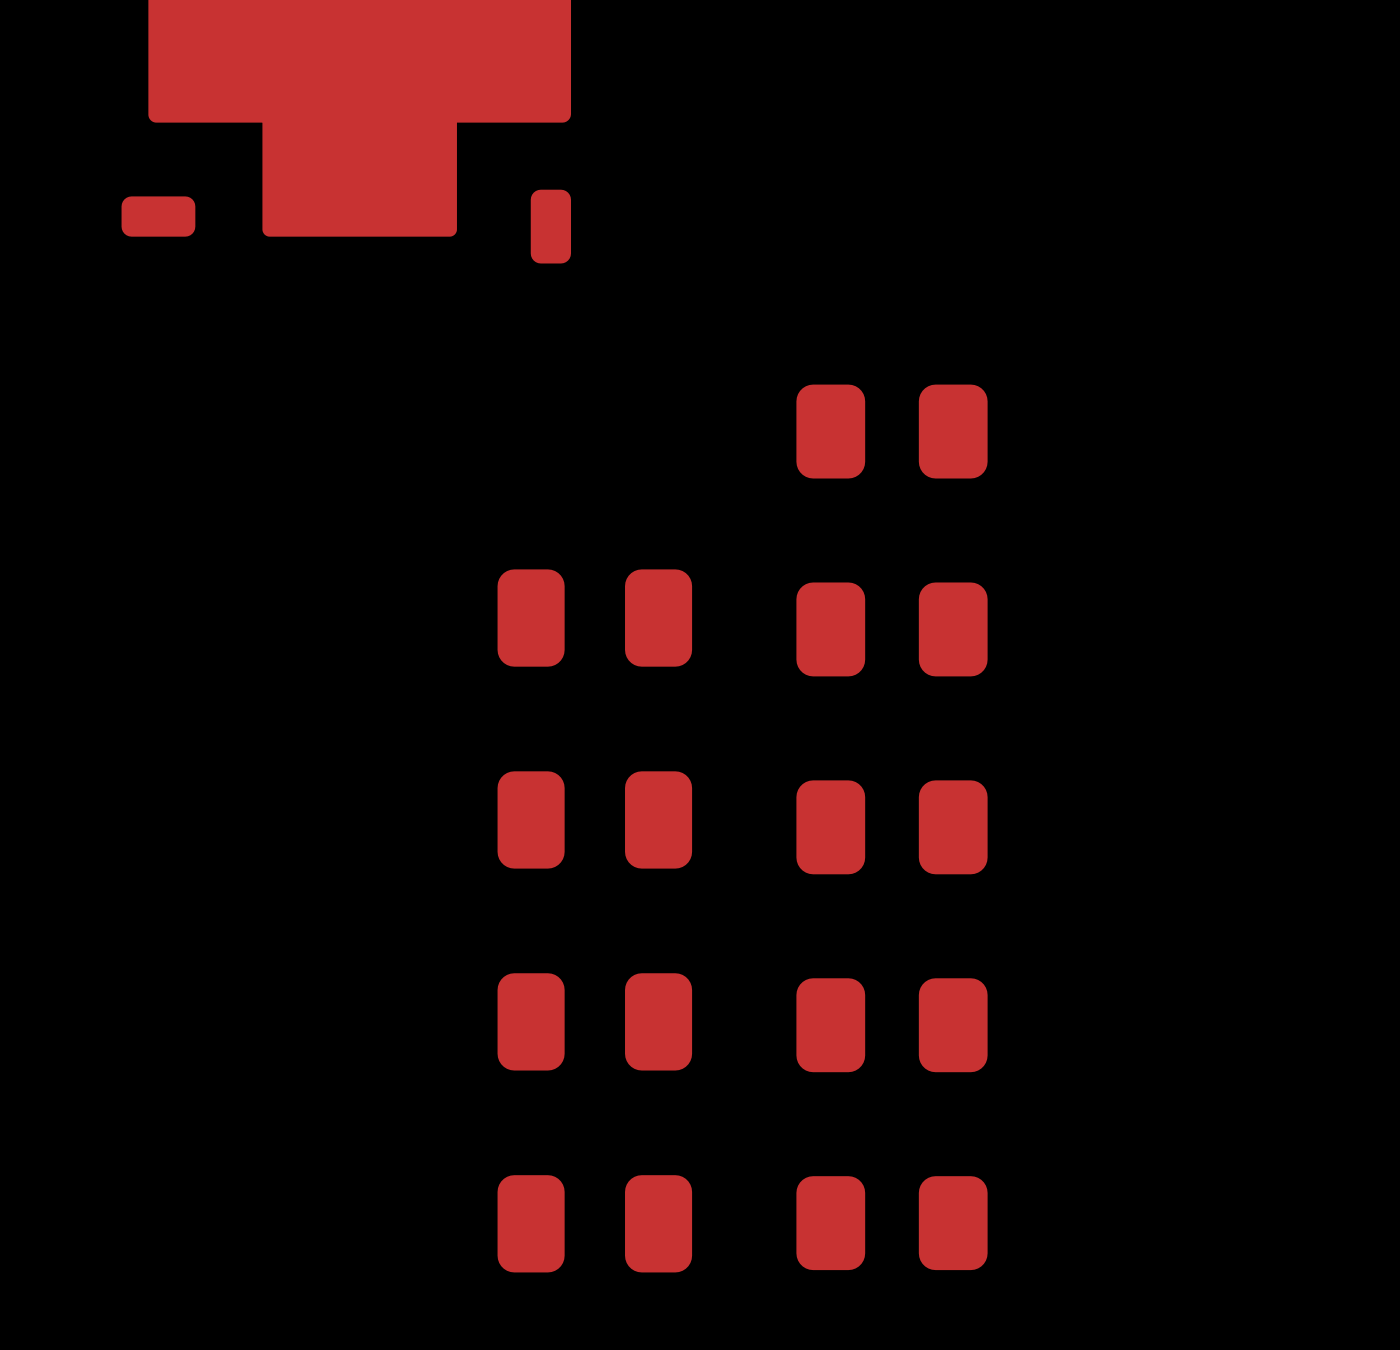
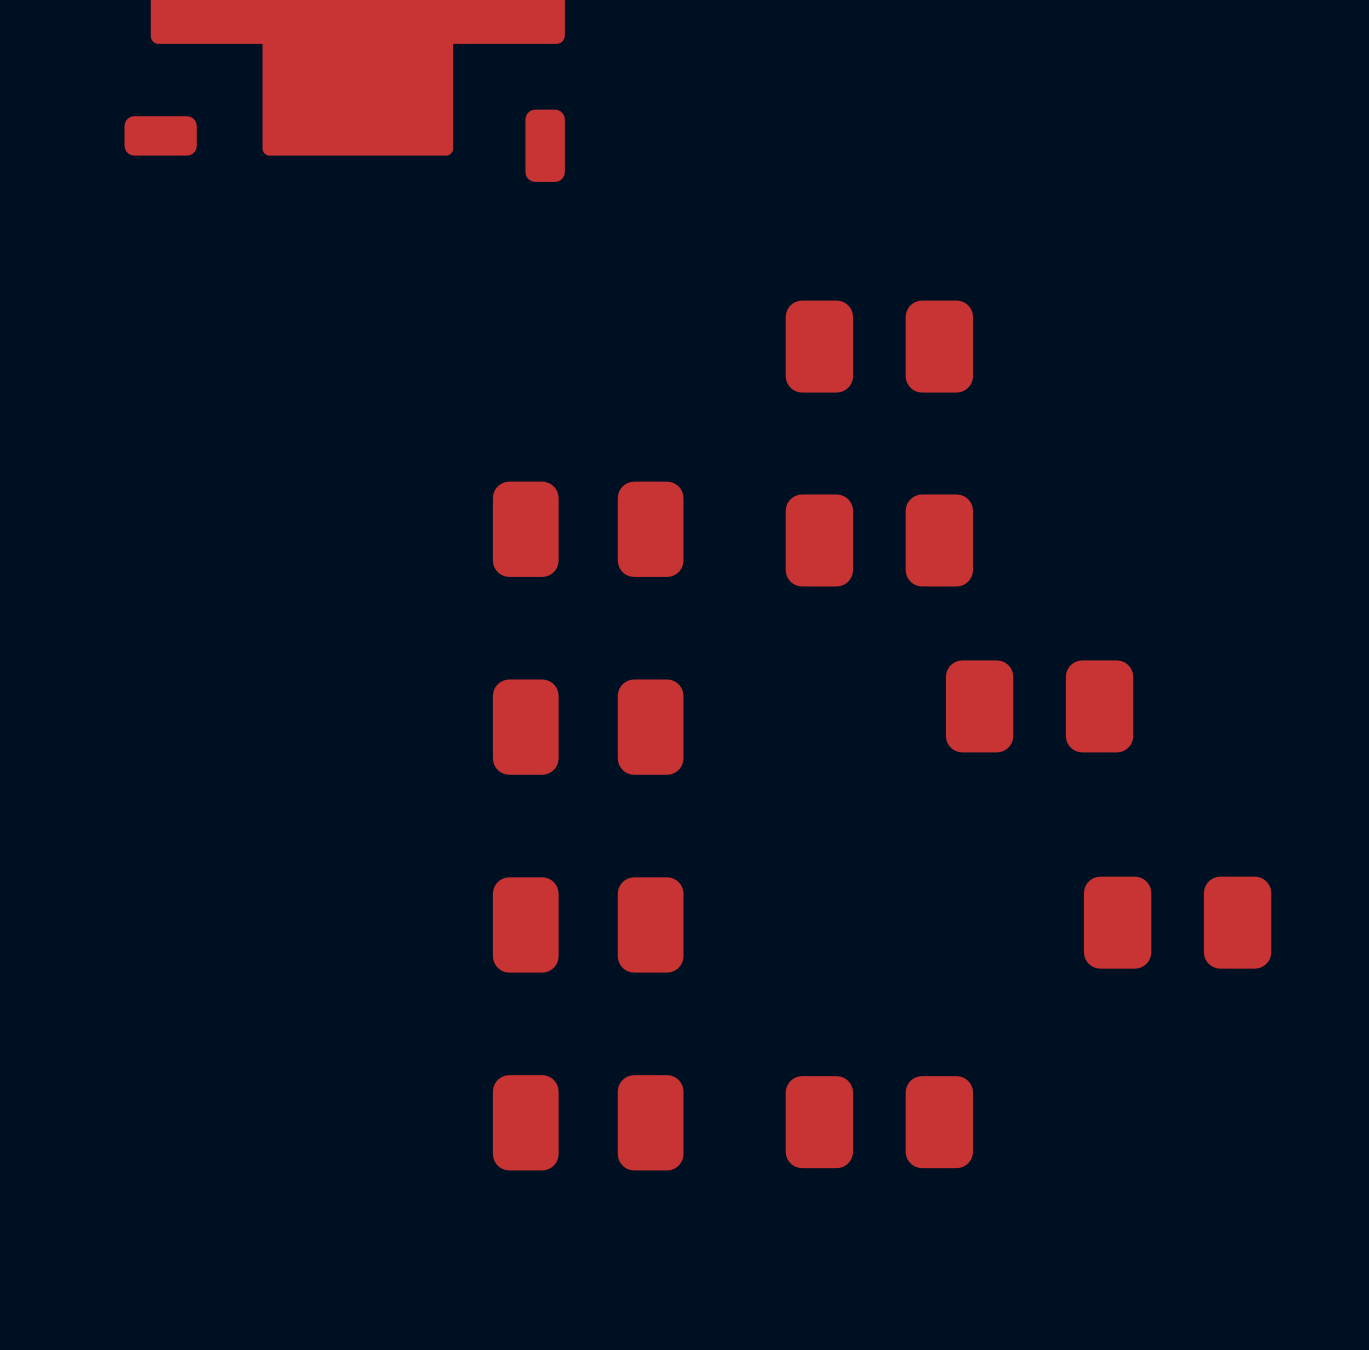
part: none -> (1039, 706)
part: (892, 827) -> none
part: none -> (1177, 922)
part: (892, 1025) -> none

